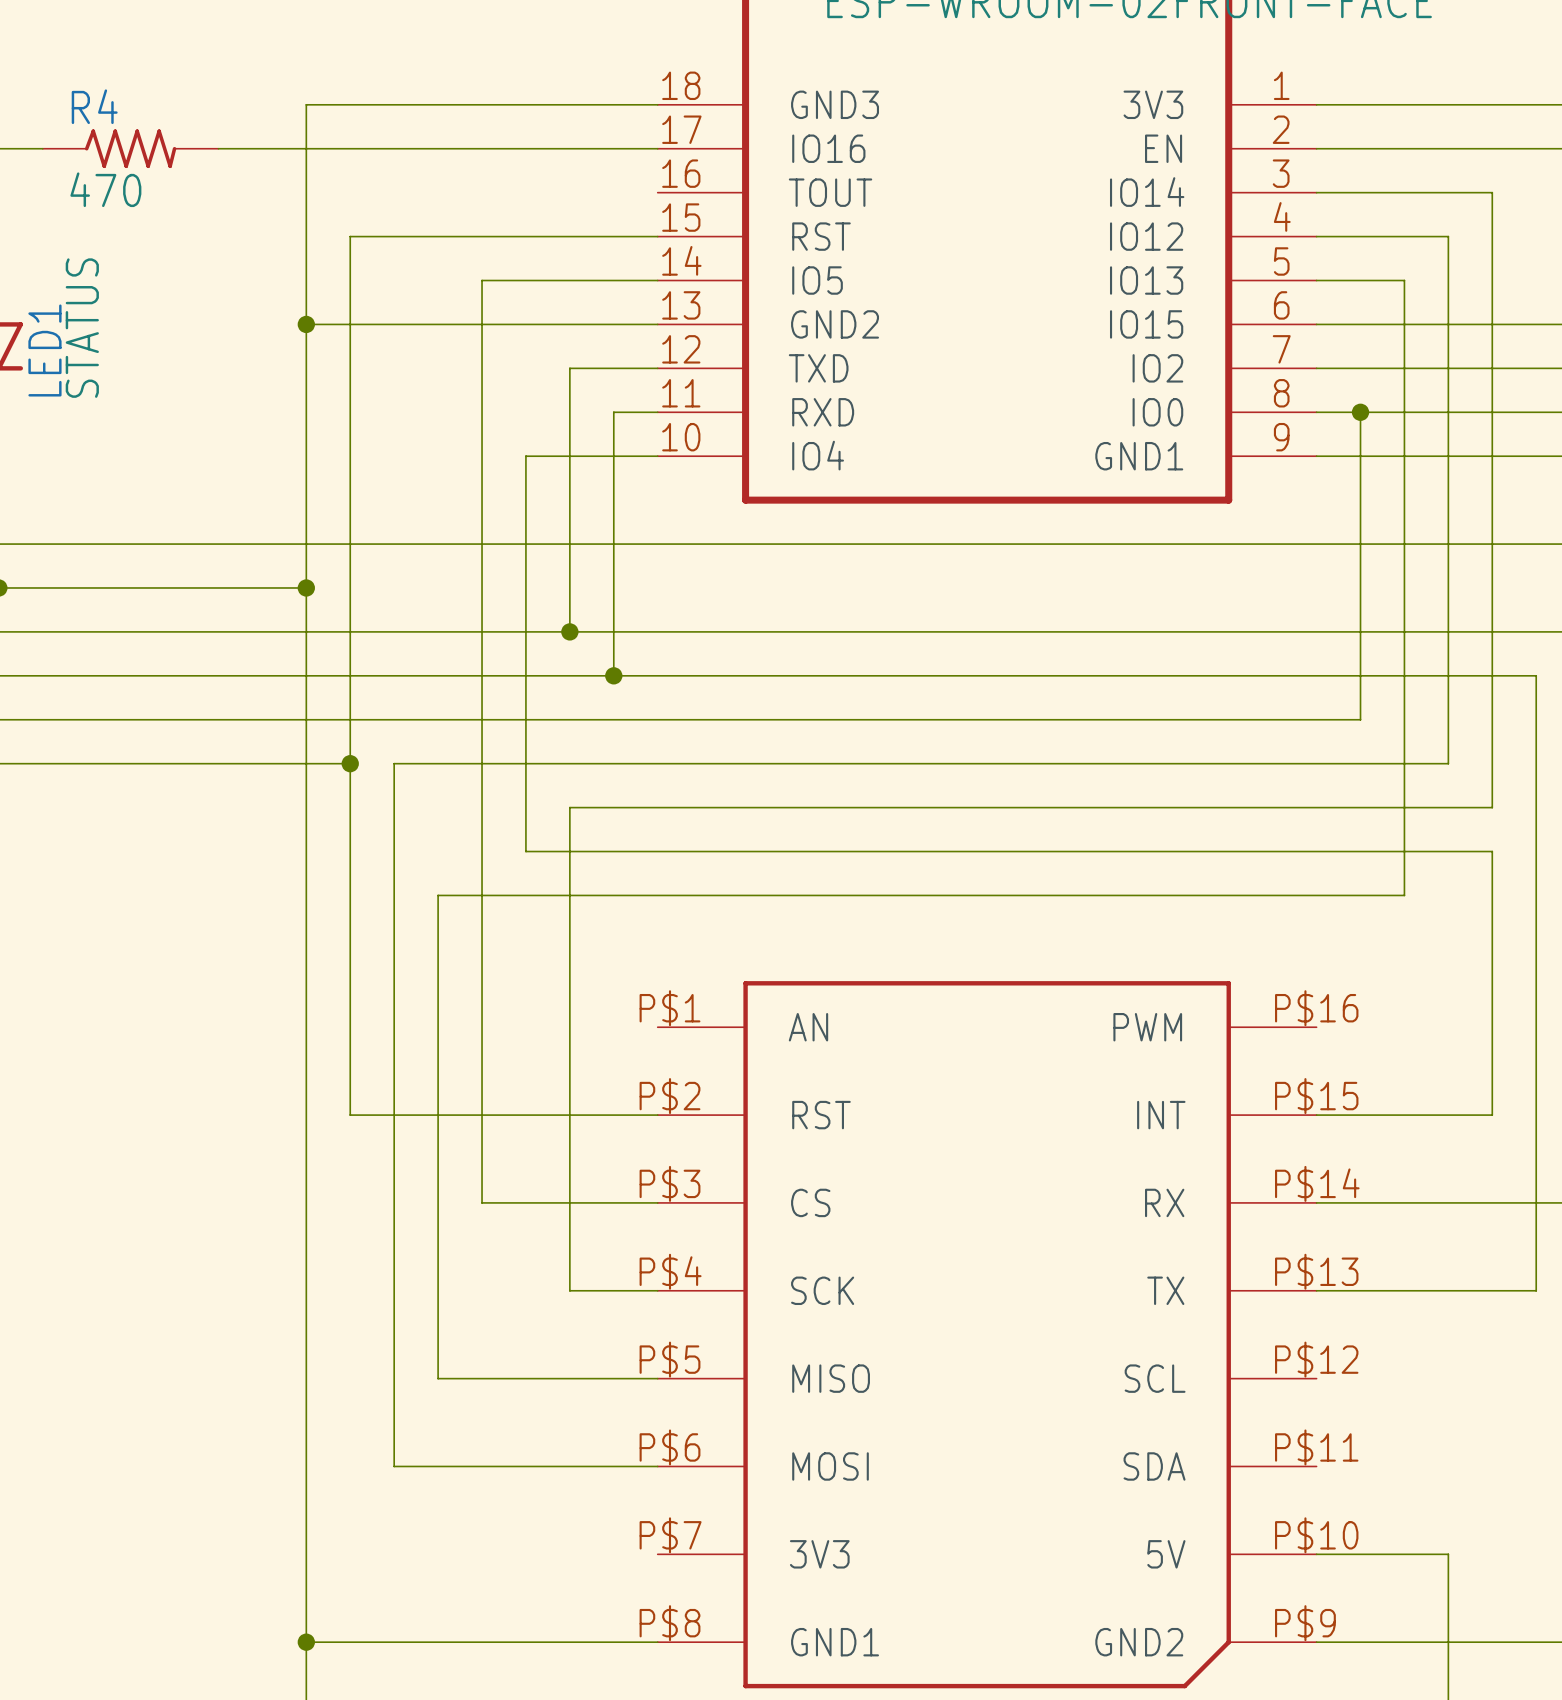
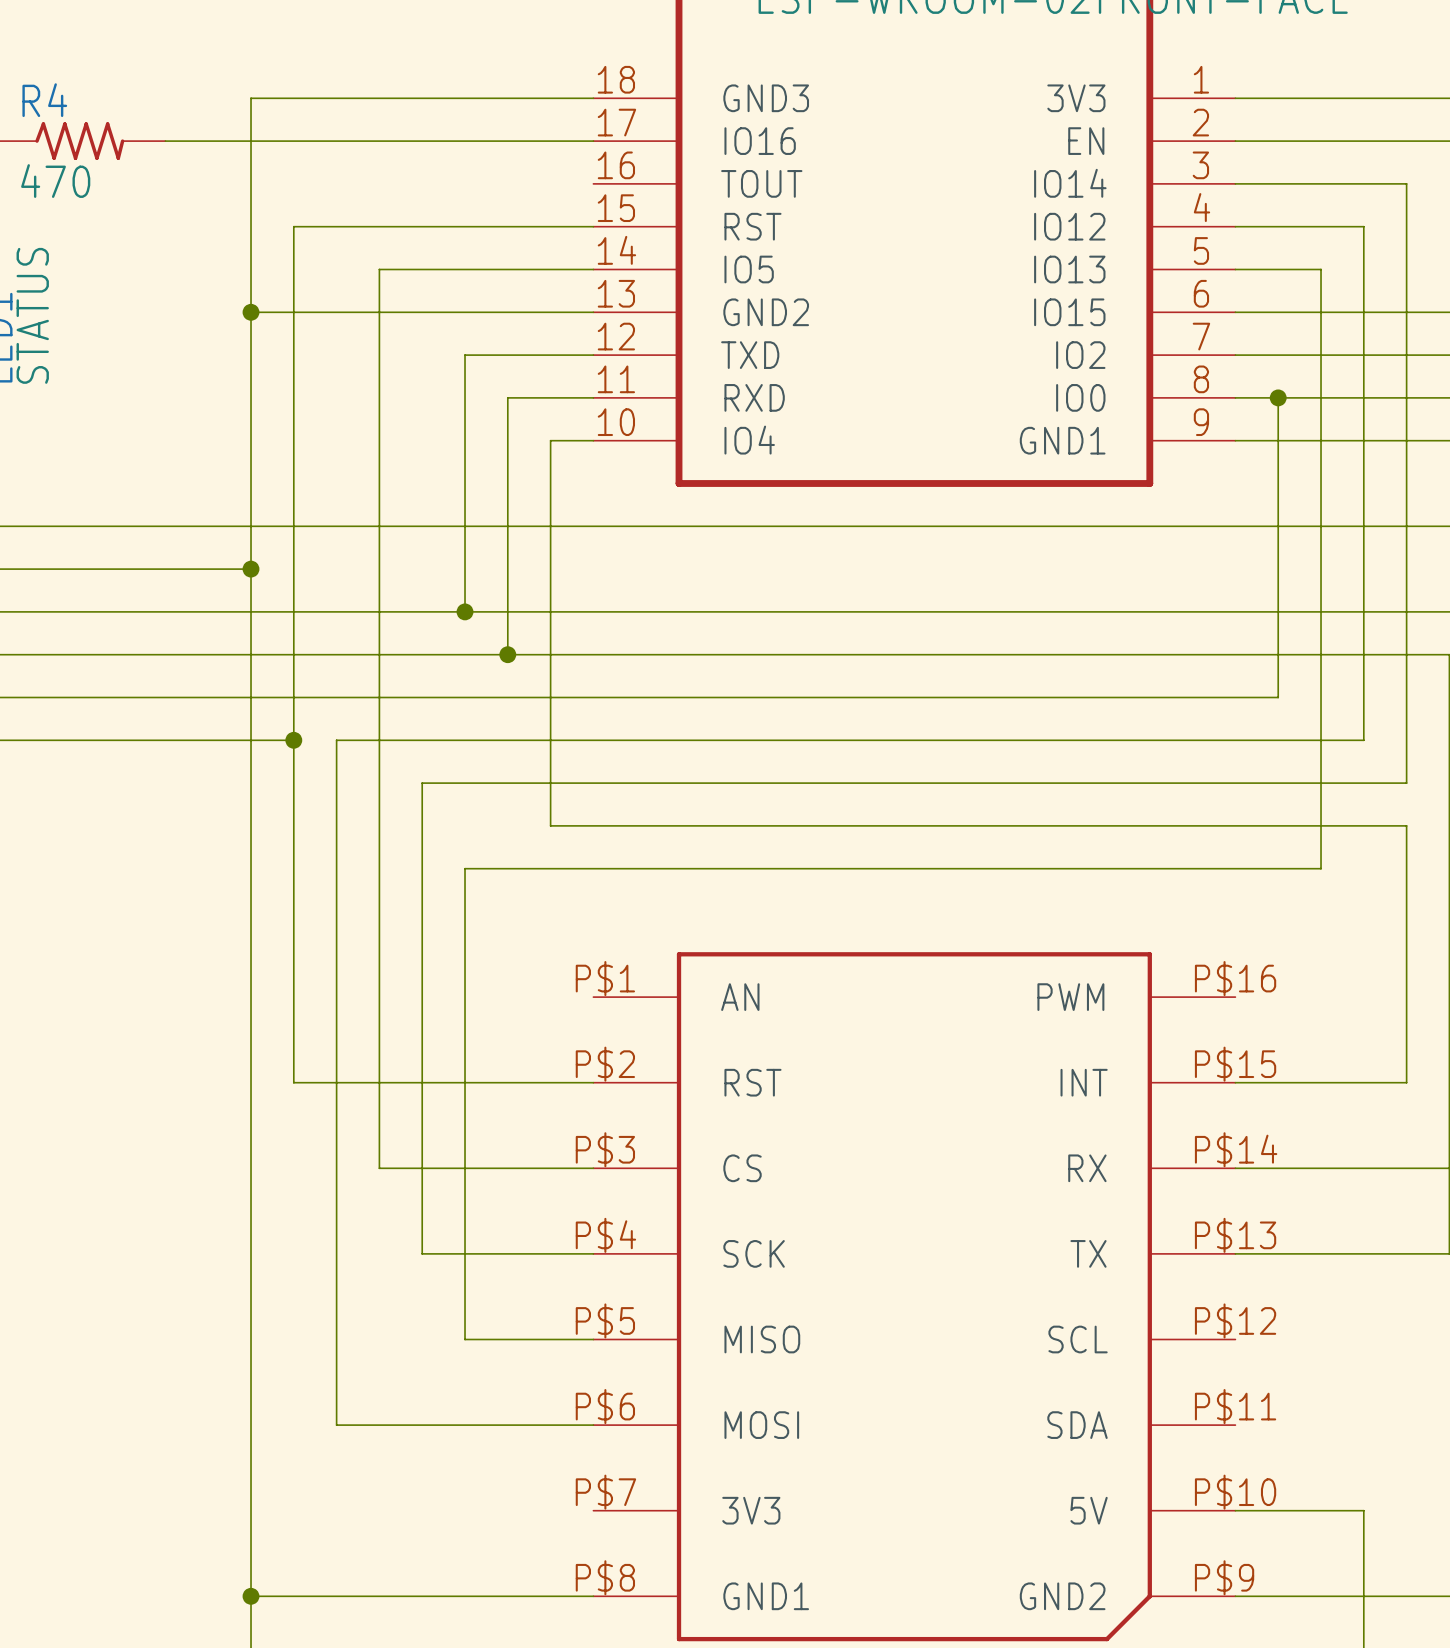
wire: (482, 280) (482, 807) -> (422, 269) (379, 269) (379, 868)
wire: (569, 368) (569, 412) -> (550, 397) (507, 397)
wire: (613, 412) (613, 456) (525, 456) -> (507, 355) (465, 355) (465, 440)
wire: (525, 631) (525, 851) (613, 851) -> (550, 654) (550, 825)
junction: none -> (465, 611)
wire: none -> (507, 611) (507, 654)
junction: (569, 631) -> none
junction: none -> (507, 654)
junction: (613, 675) -> none
wire: (569, 807) (569, 1290) -> (507, 783) (422, 783)
wire: (438, 895) (525, 895) -> (465, 1339) (465, 868)
wire: (438, 1202) (438, 1378) (525, 1378) -> (379, 1168) (422, 1168) (422, 1253) (507, 1253)

